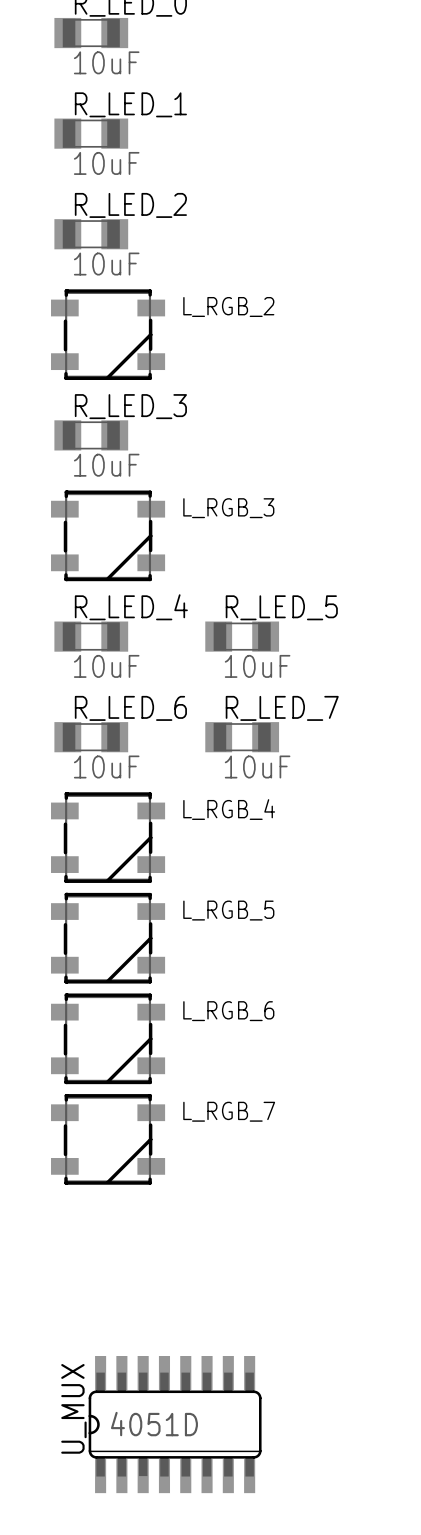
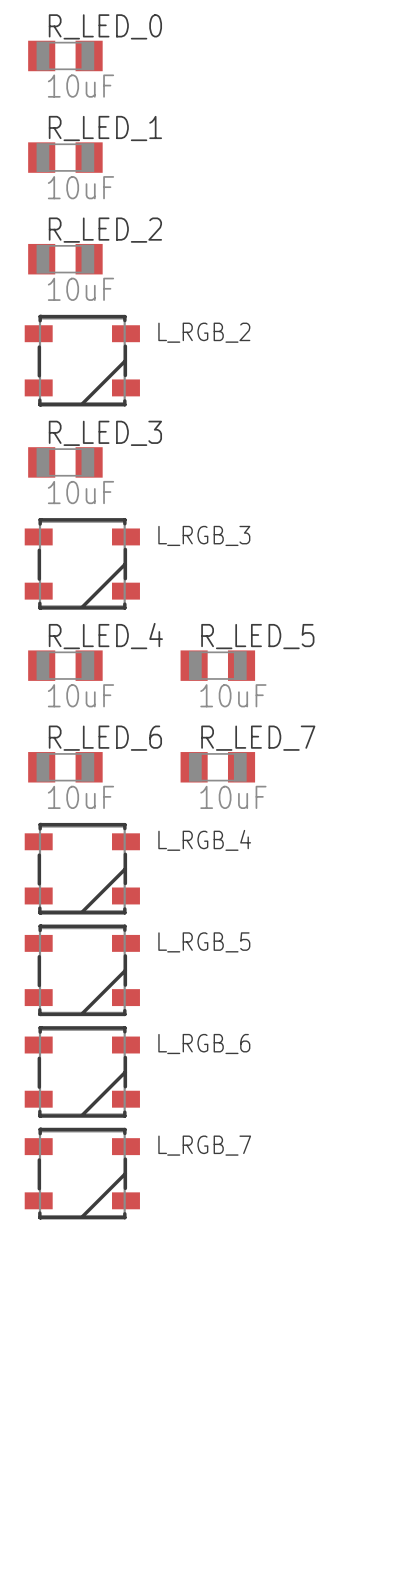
U_MUX: 4051D (175, 1424) -> none

